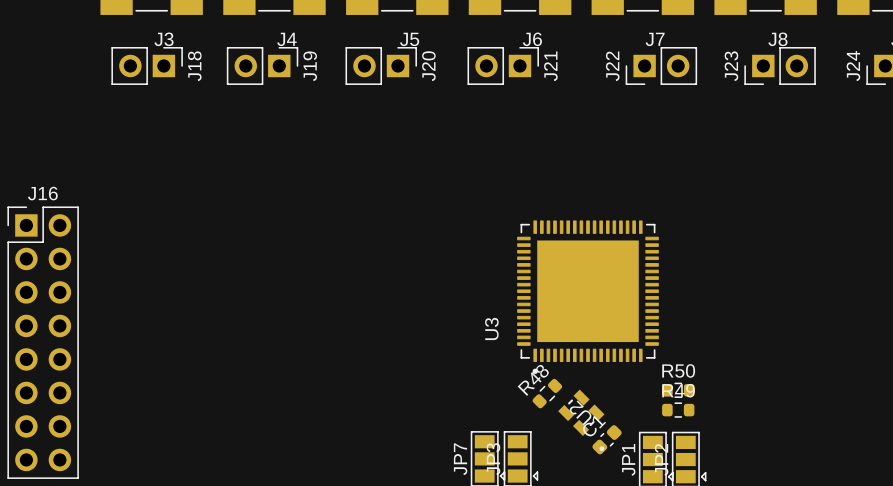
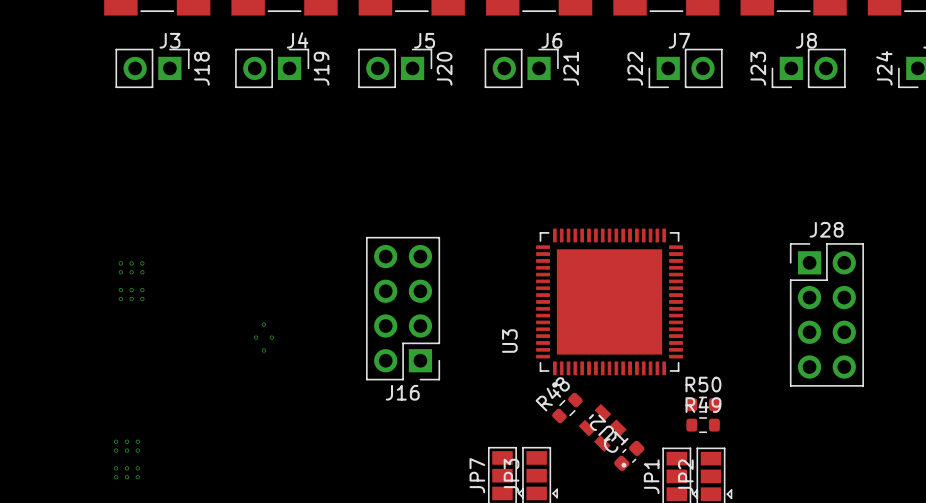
J16 name position: J16 (42, 193) -> J16 (402, 392)
J16 footprint: [7, 206, 79, 479] -> [366, 236, 441, 381]
part: none -> (131, 281)
J28: none -> (826, 314)
part: none -> (263, 337)
part: none -> (126, 459)

